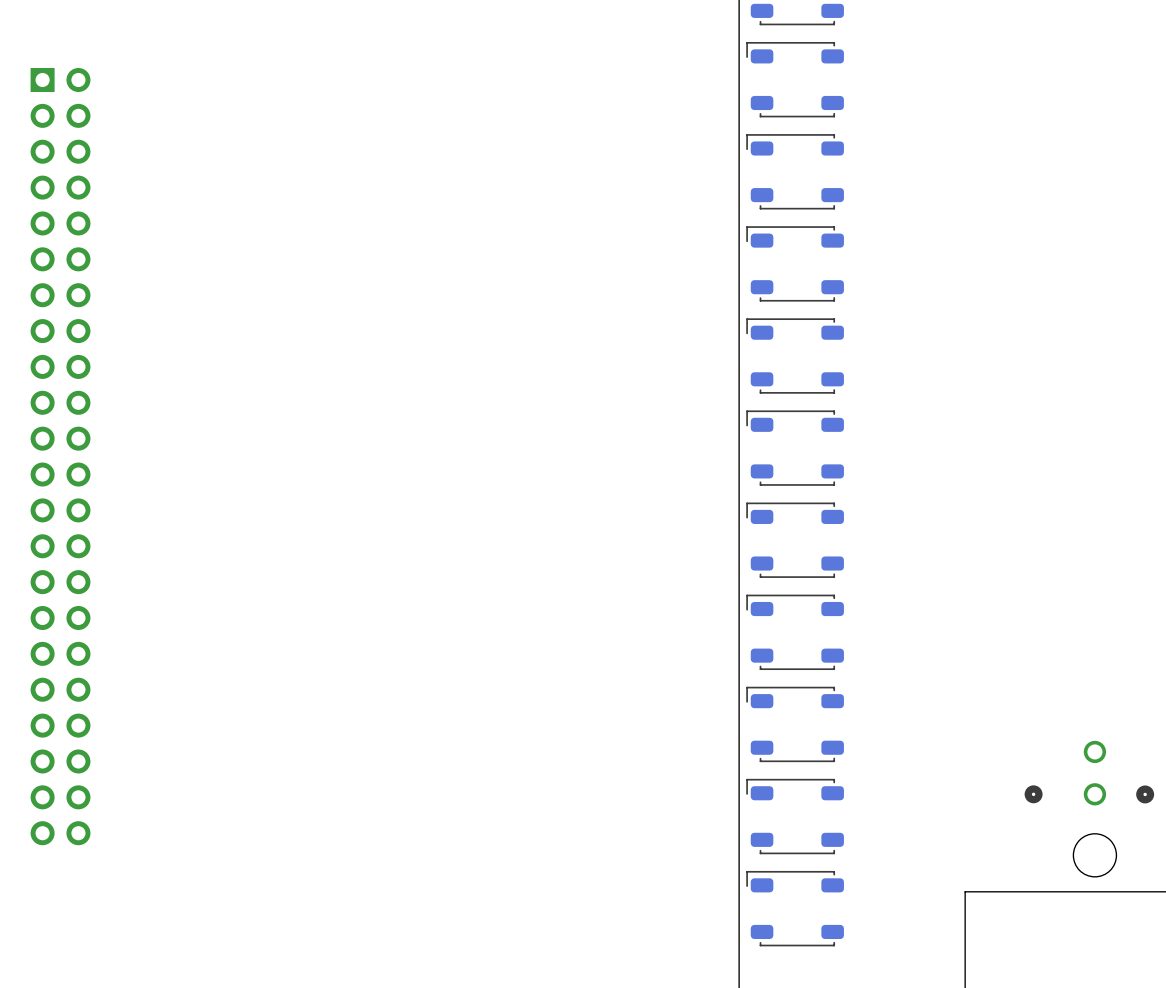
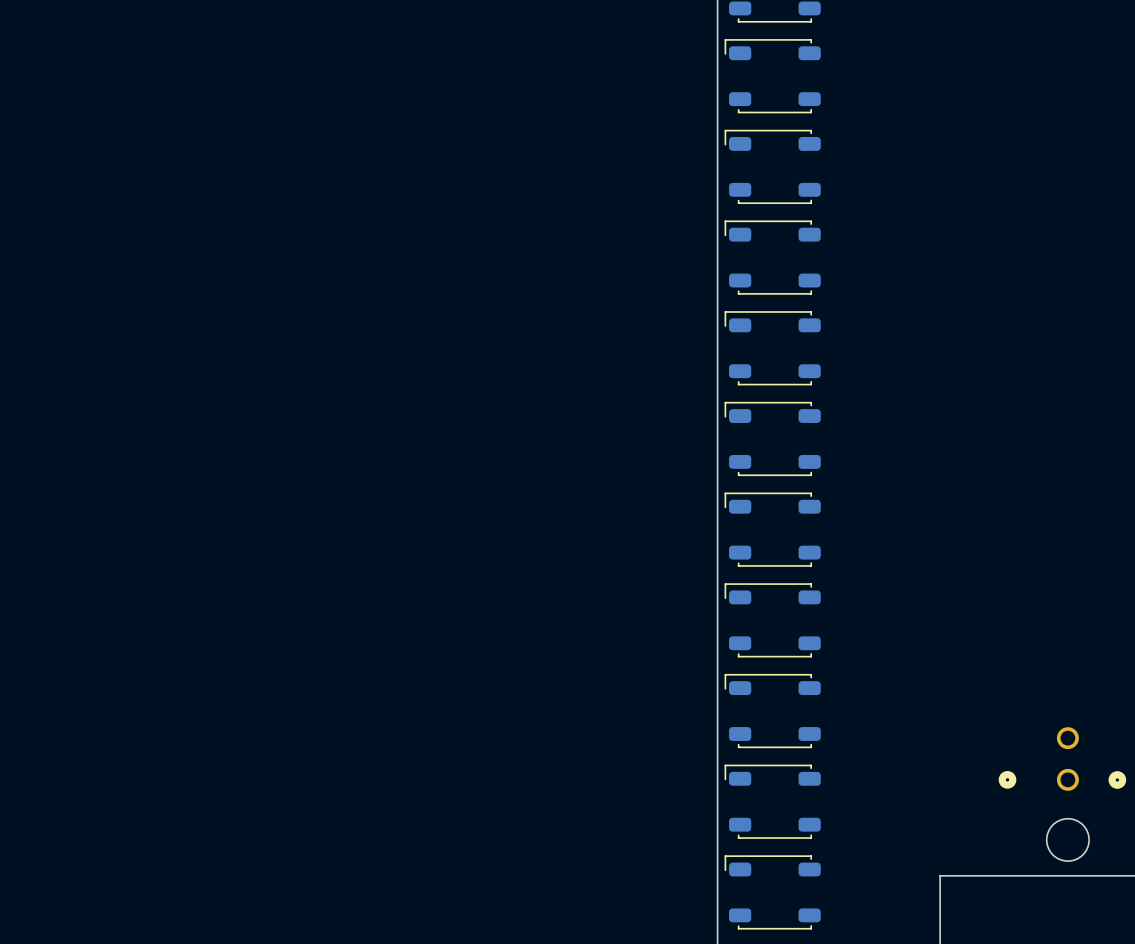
part: (60, 456) -> none

